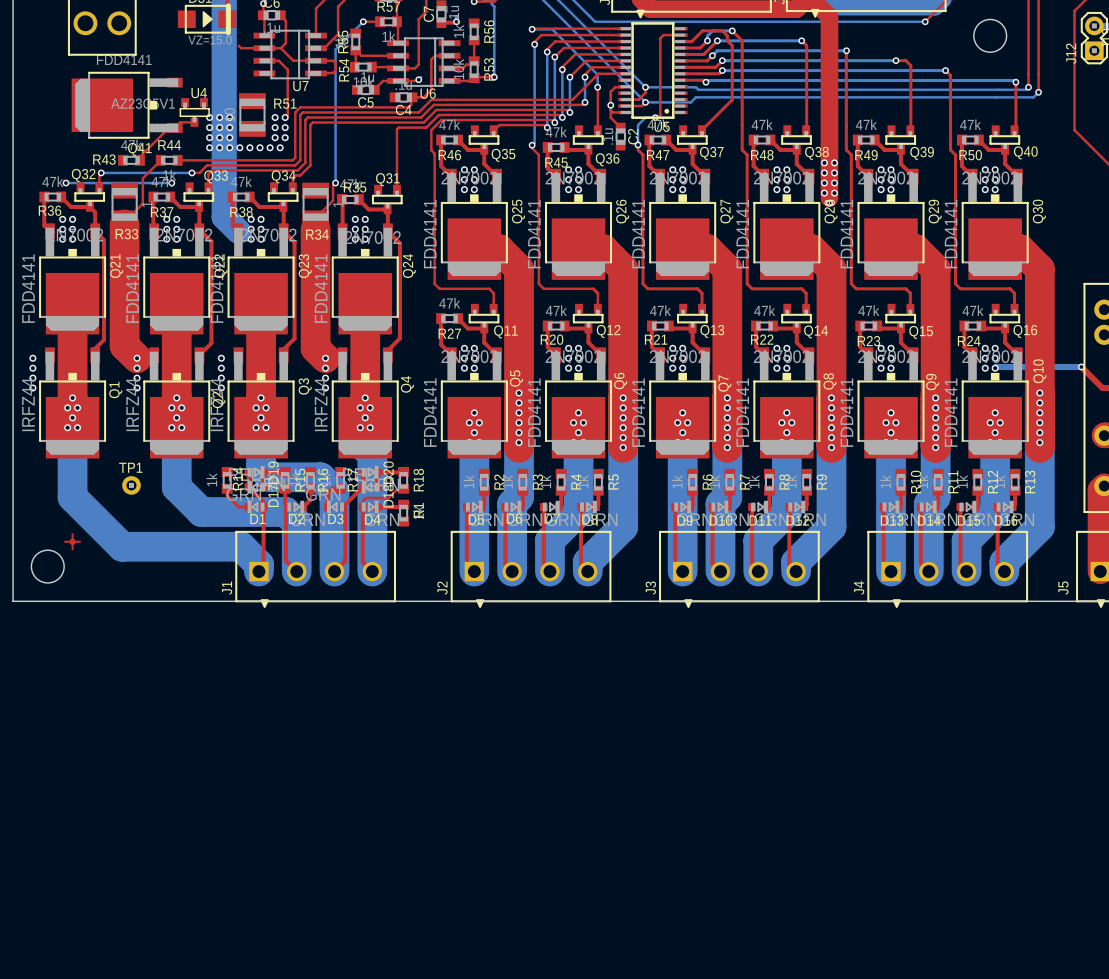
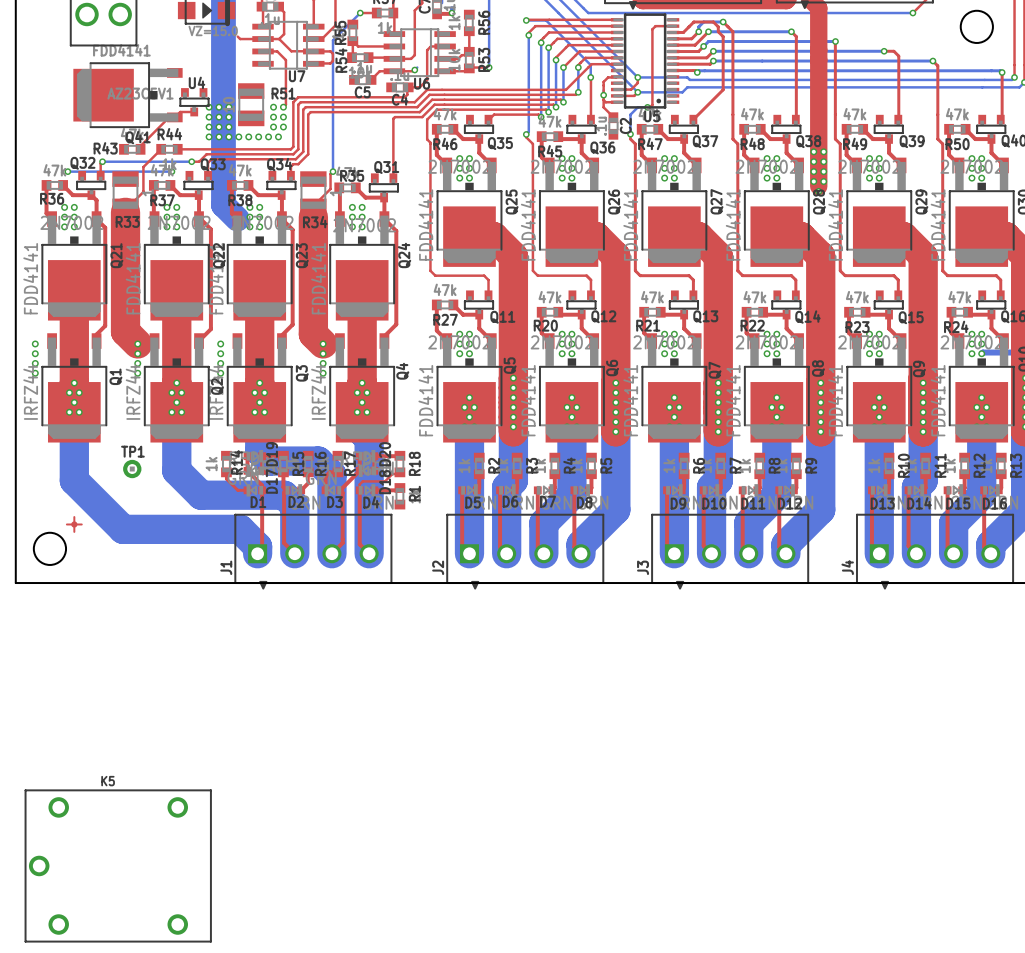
K5: none -> (118, 865)

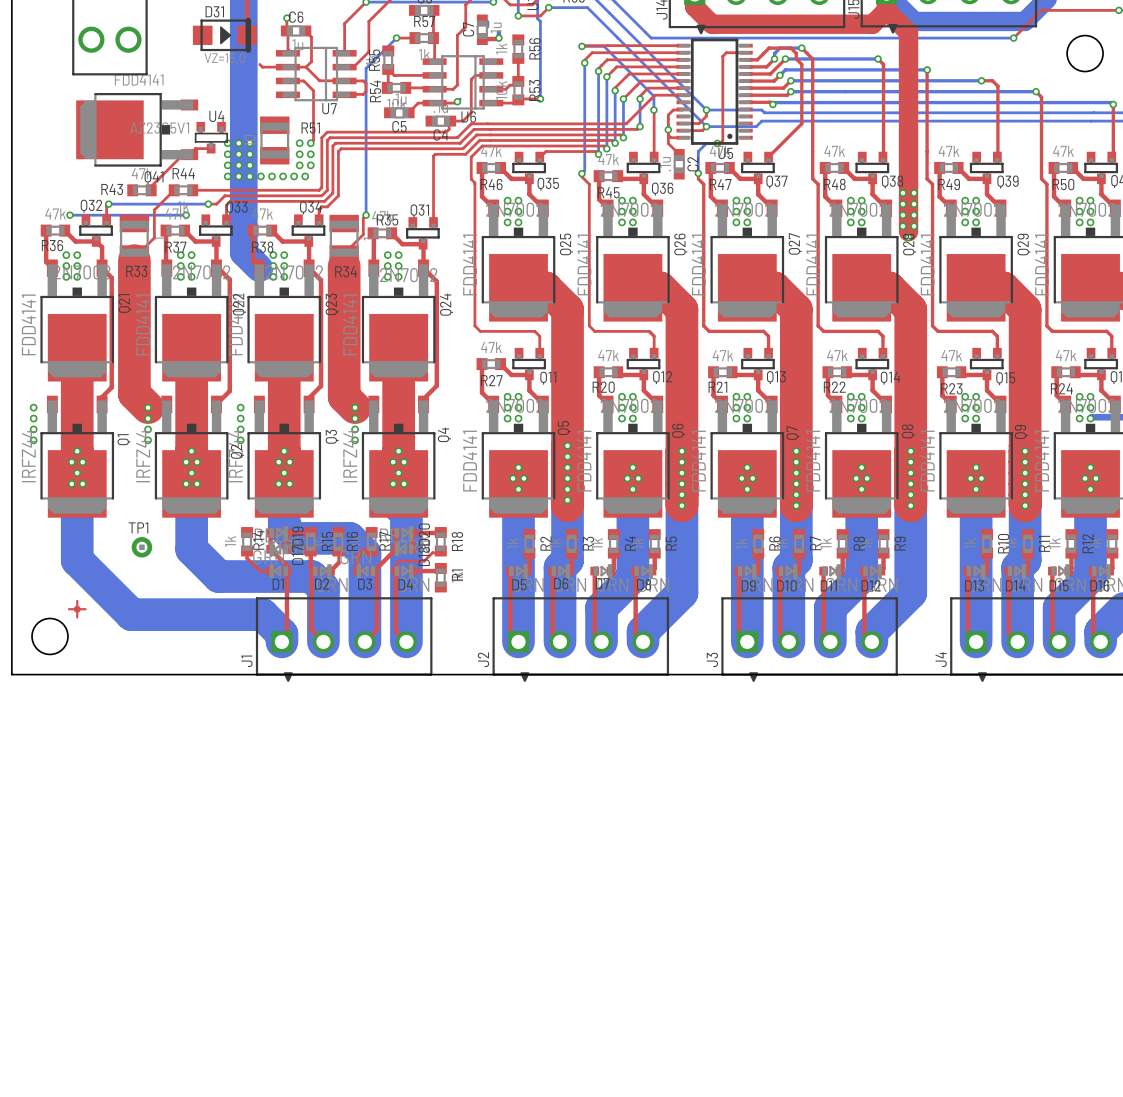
K5: (118, 865) -> none

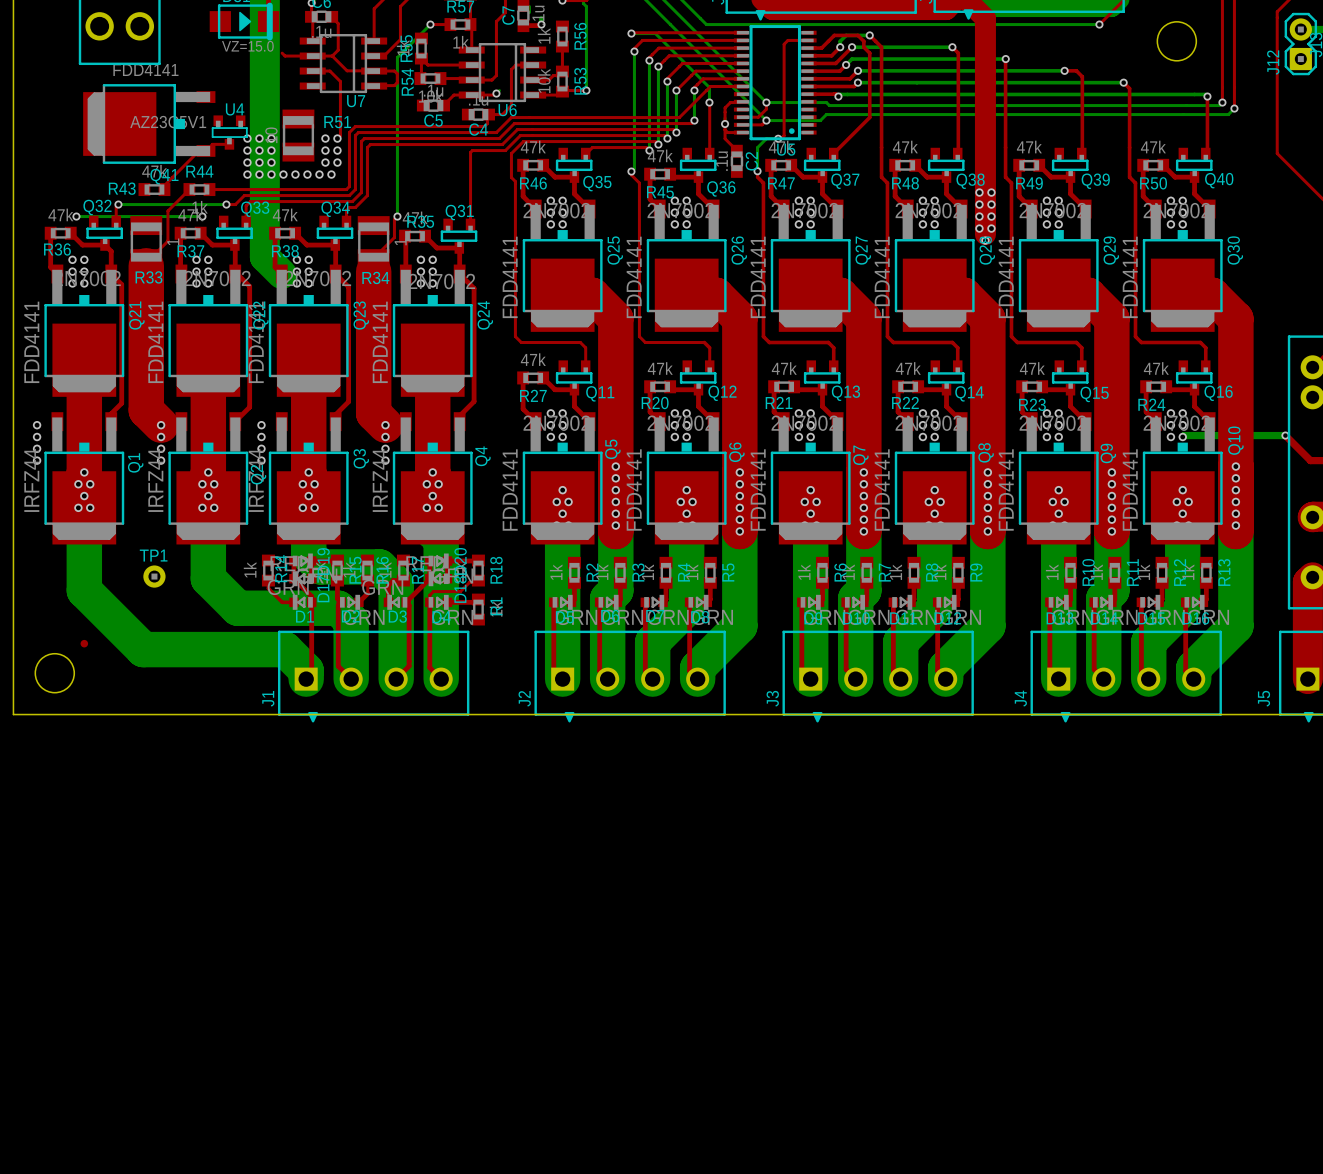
part footprint: [67, 599, 87, 619] -> [80, 639, 89, 648]

